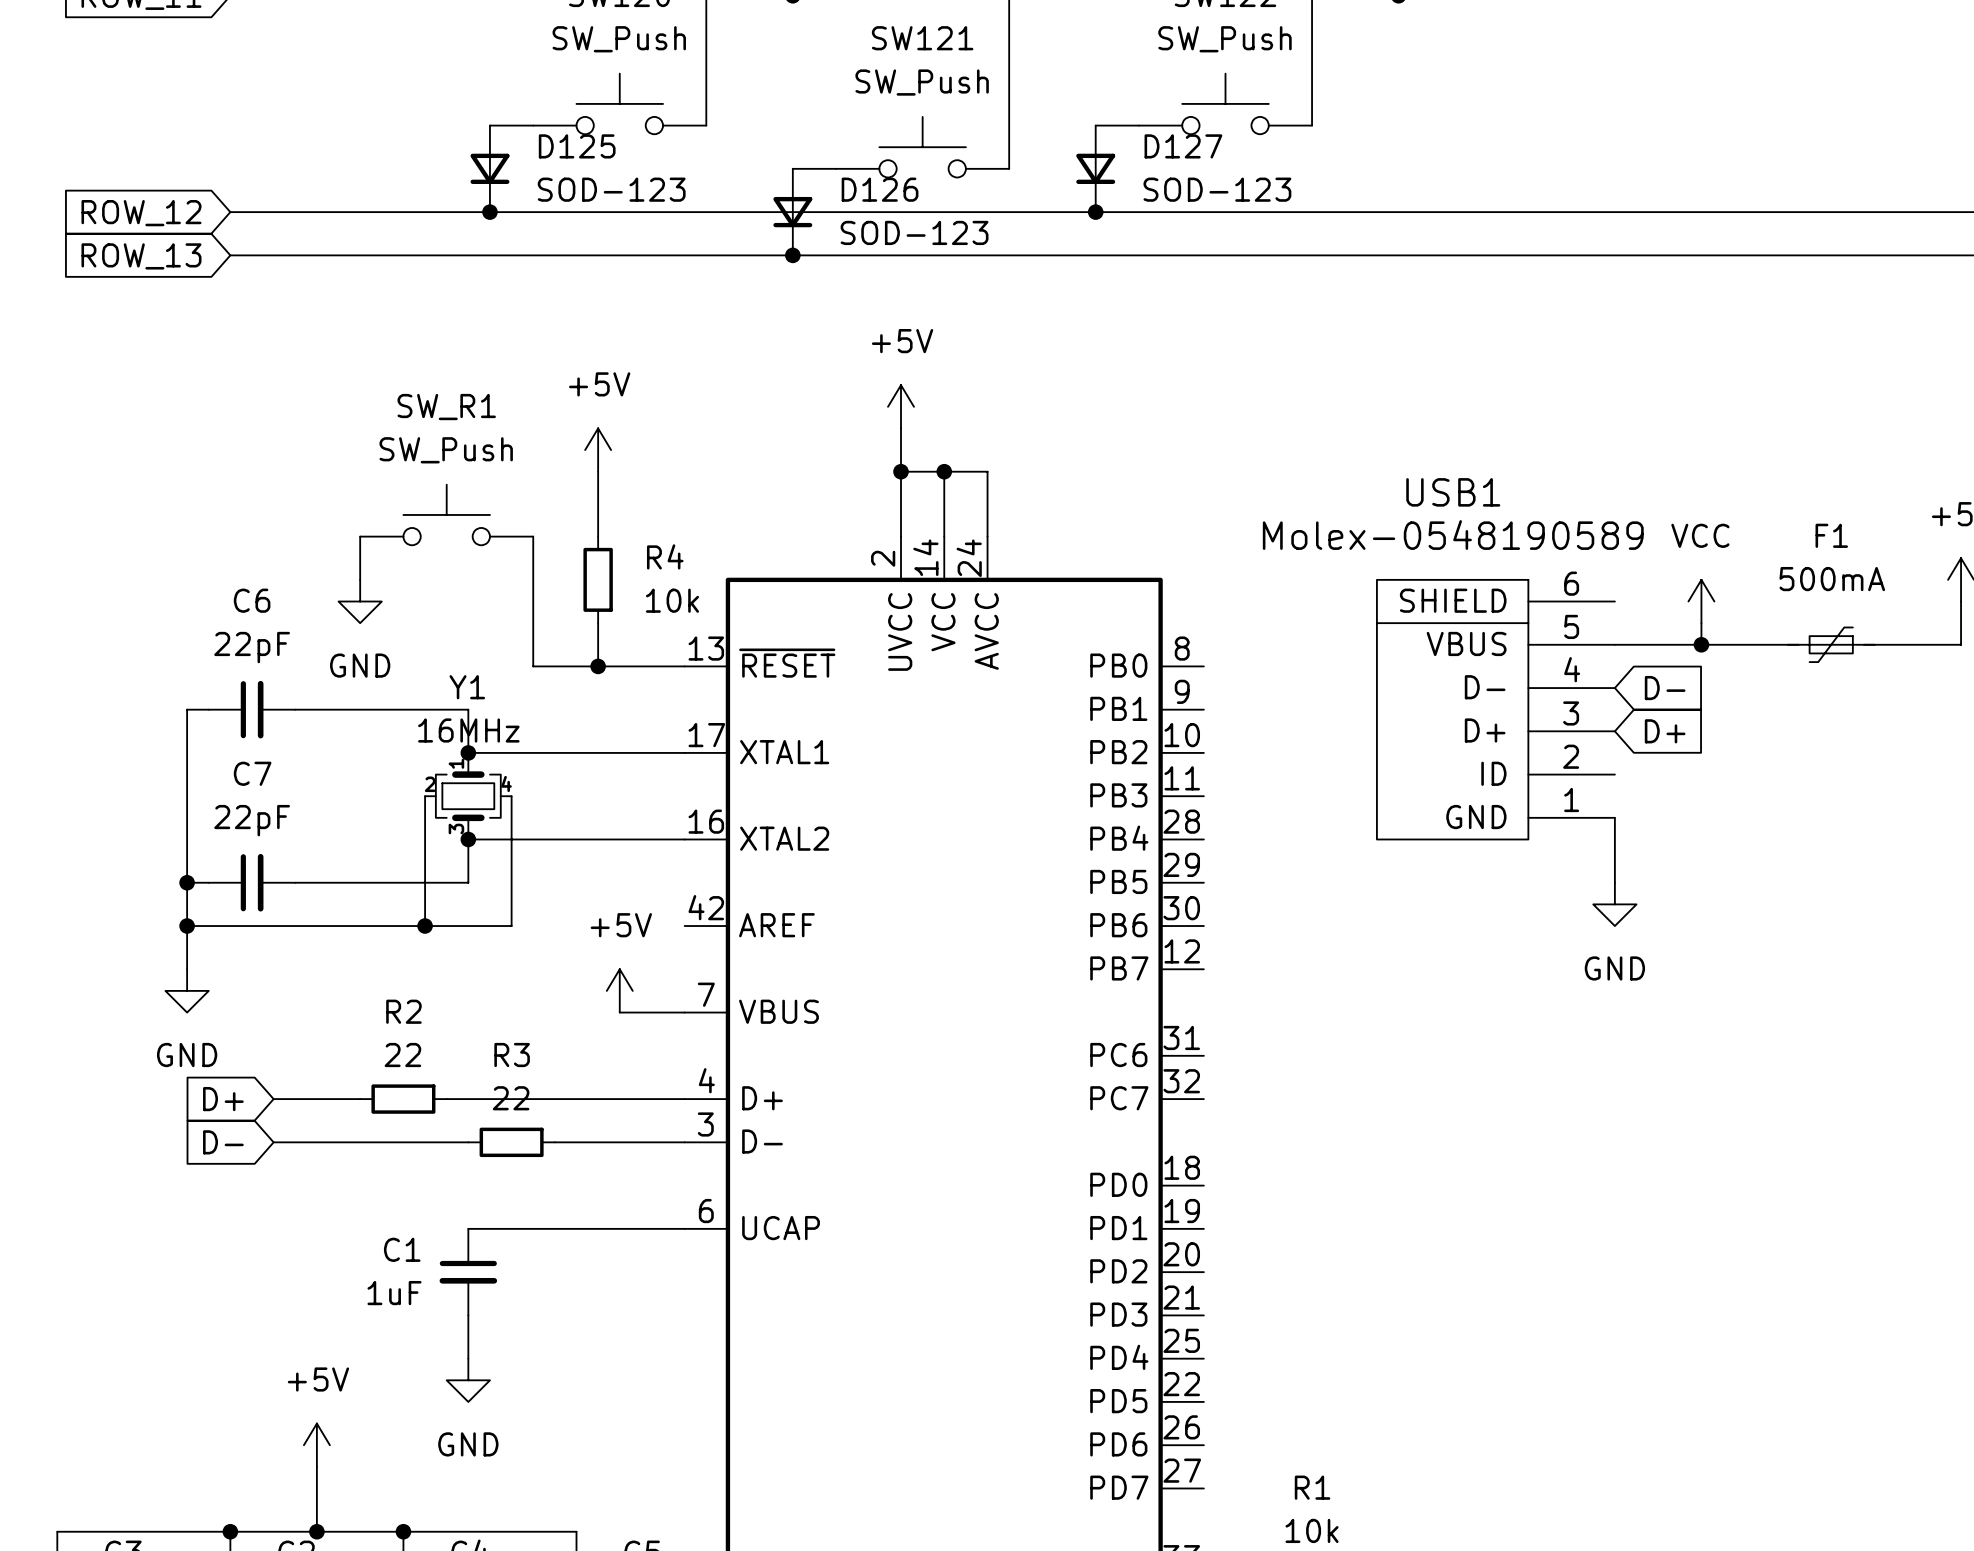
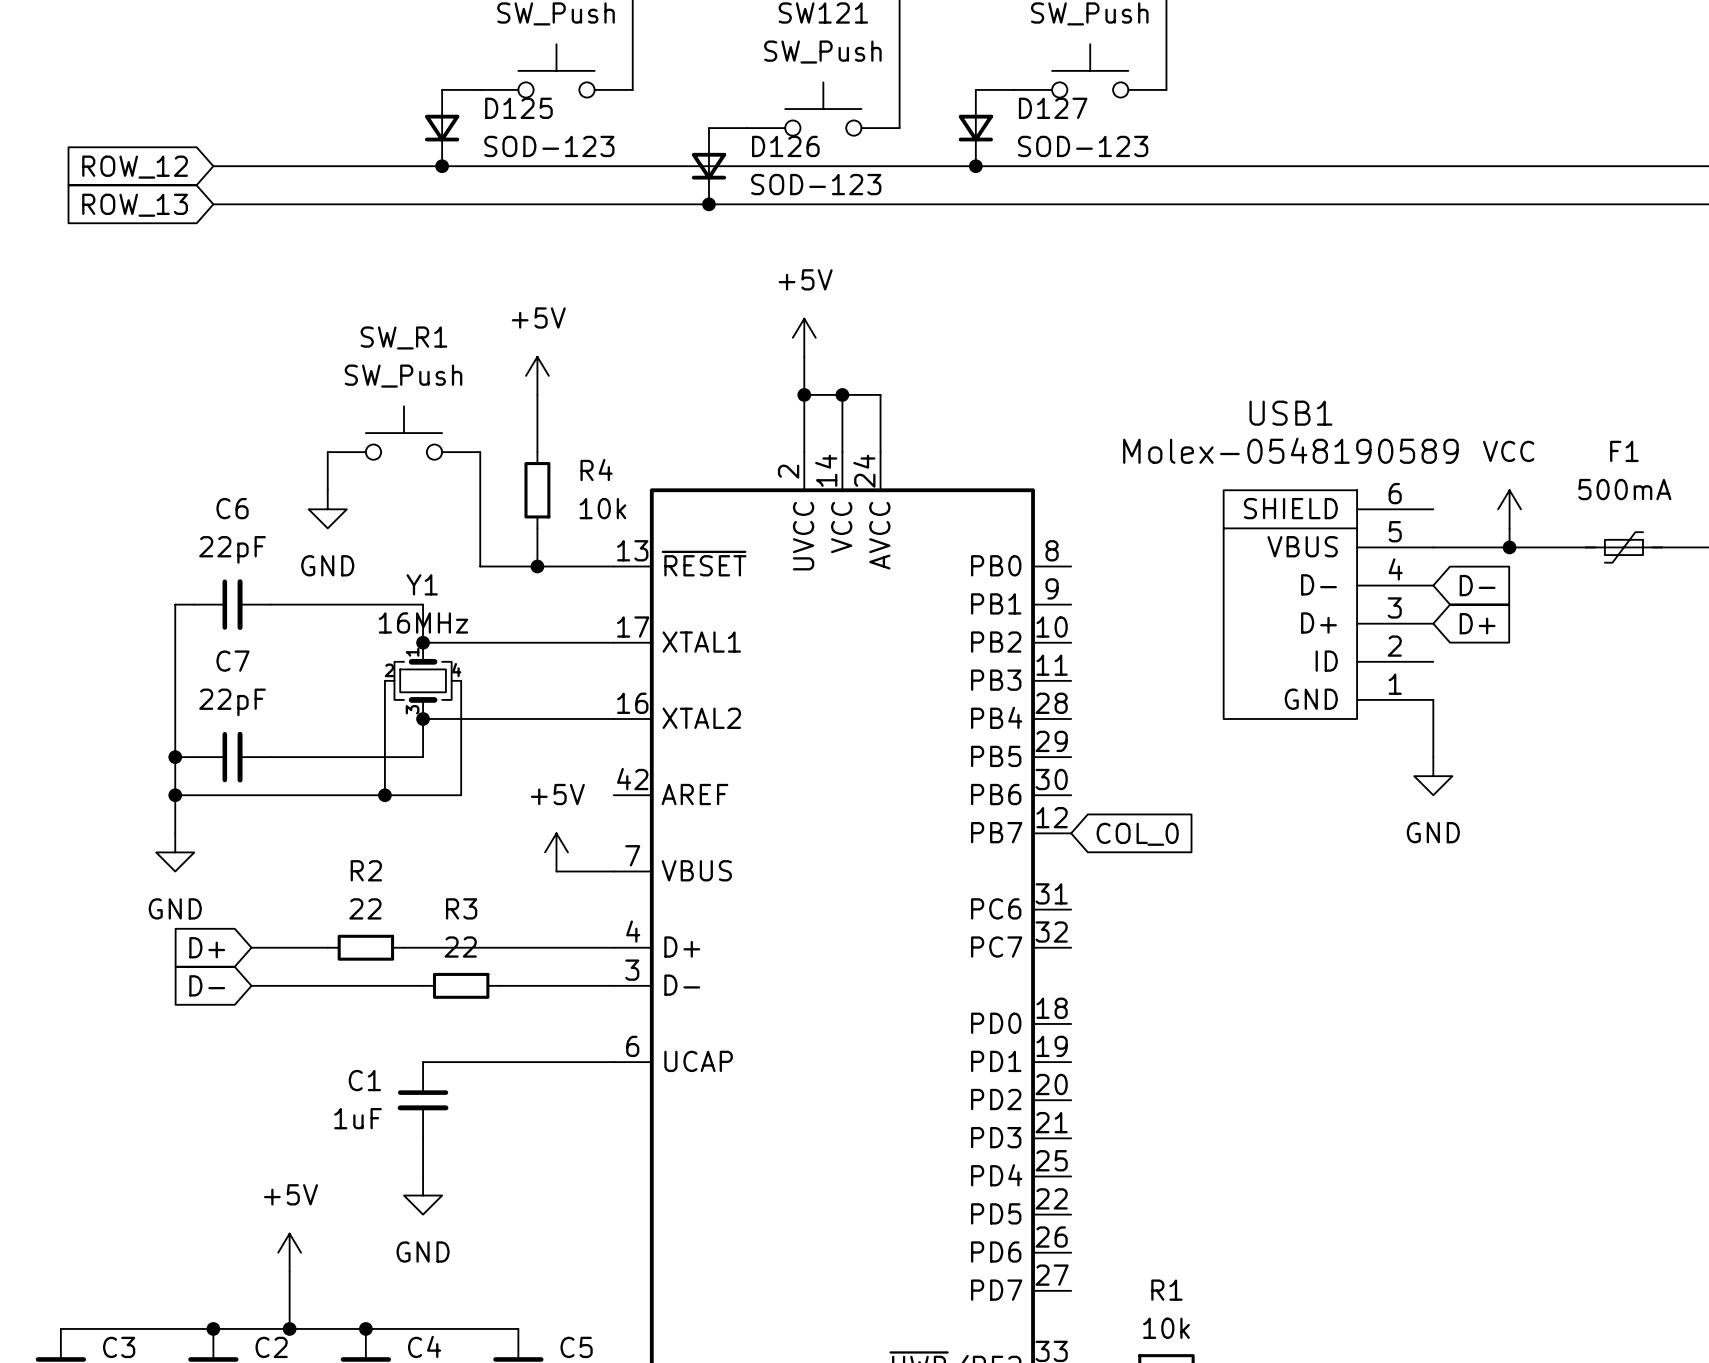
global label: none -> COL_0 (1137, 834)

